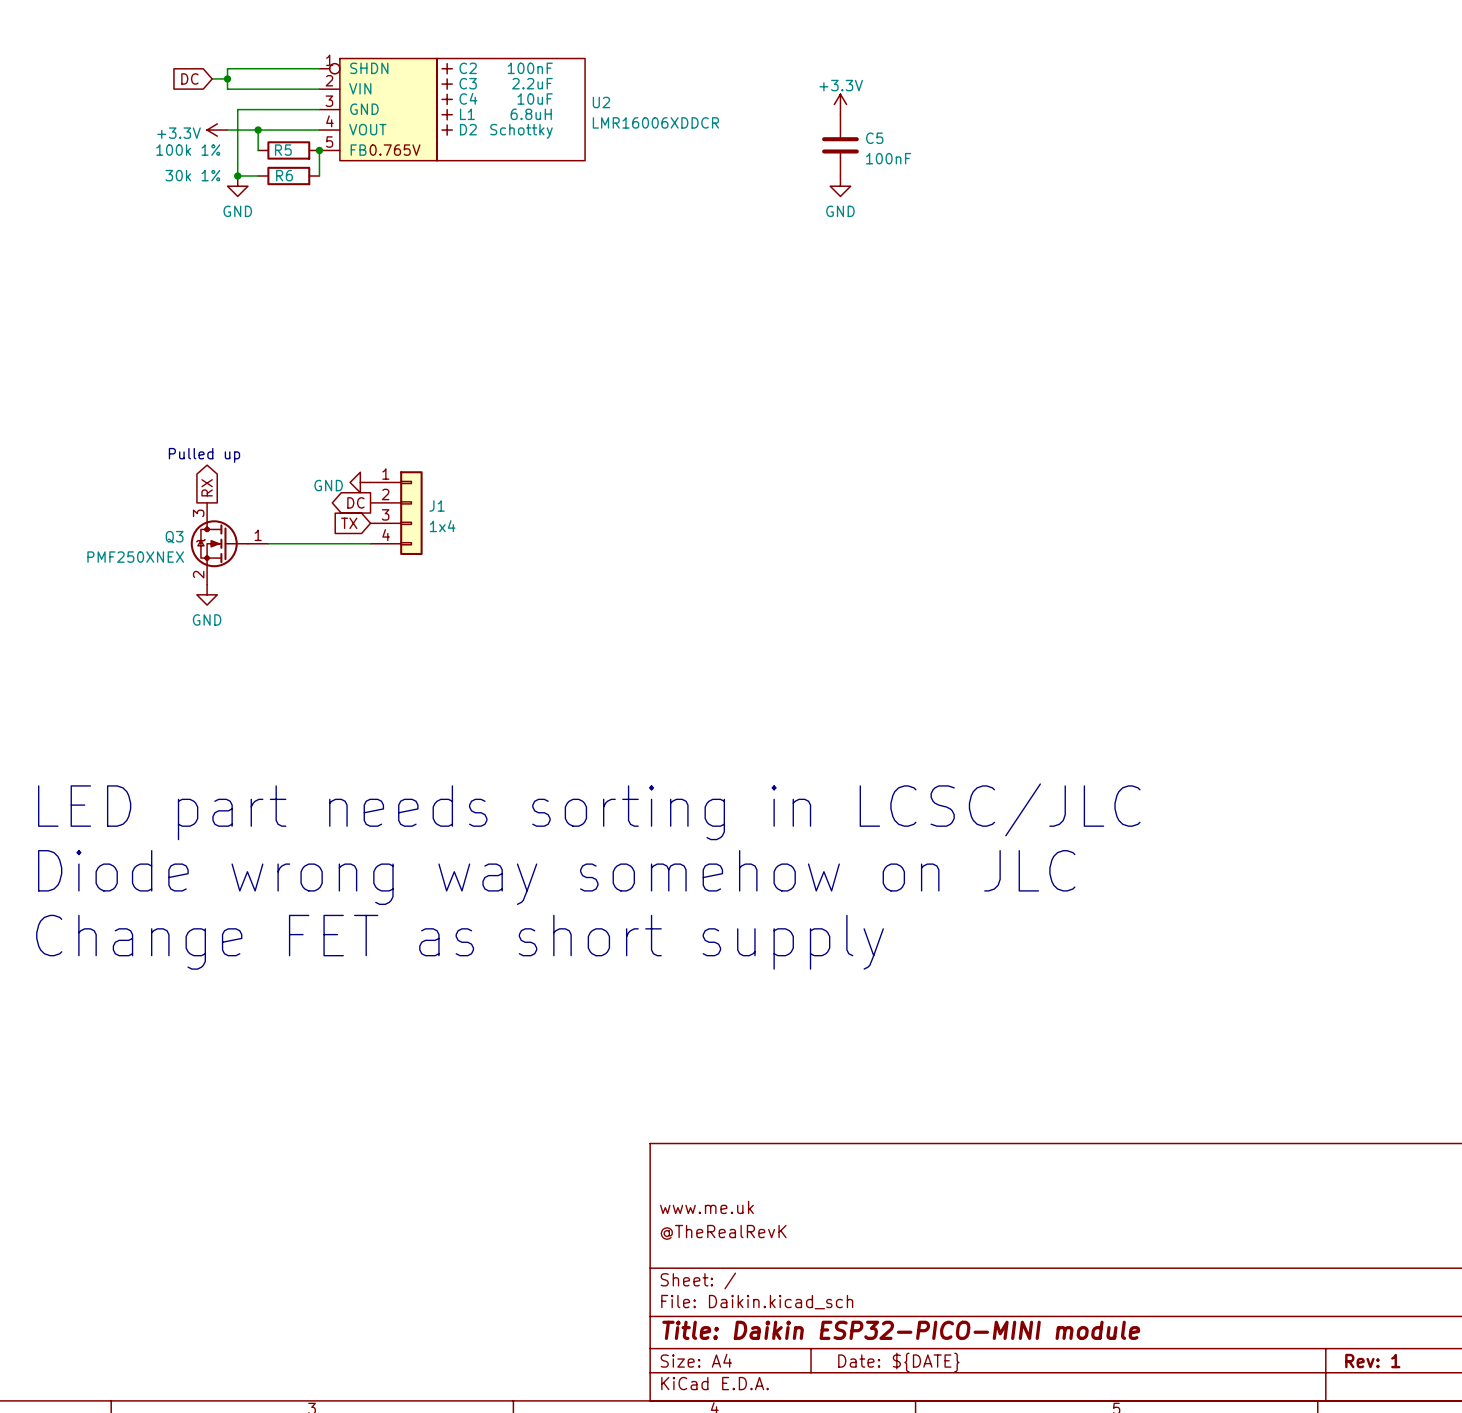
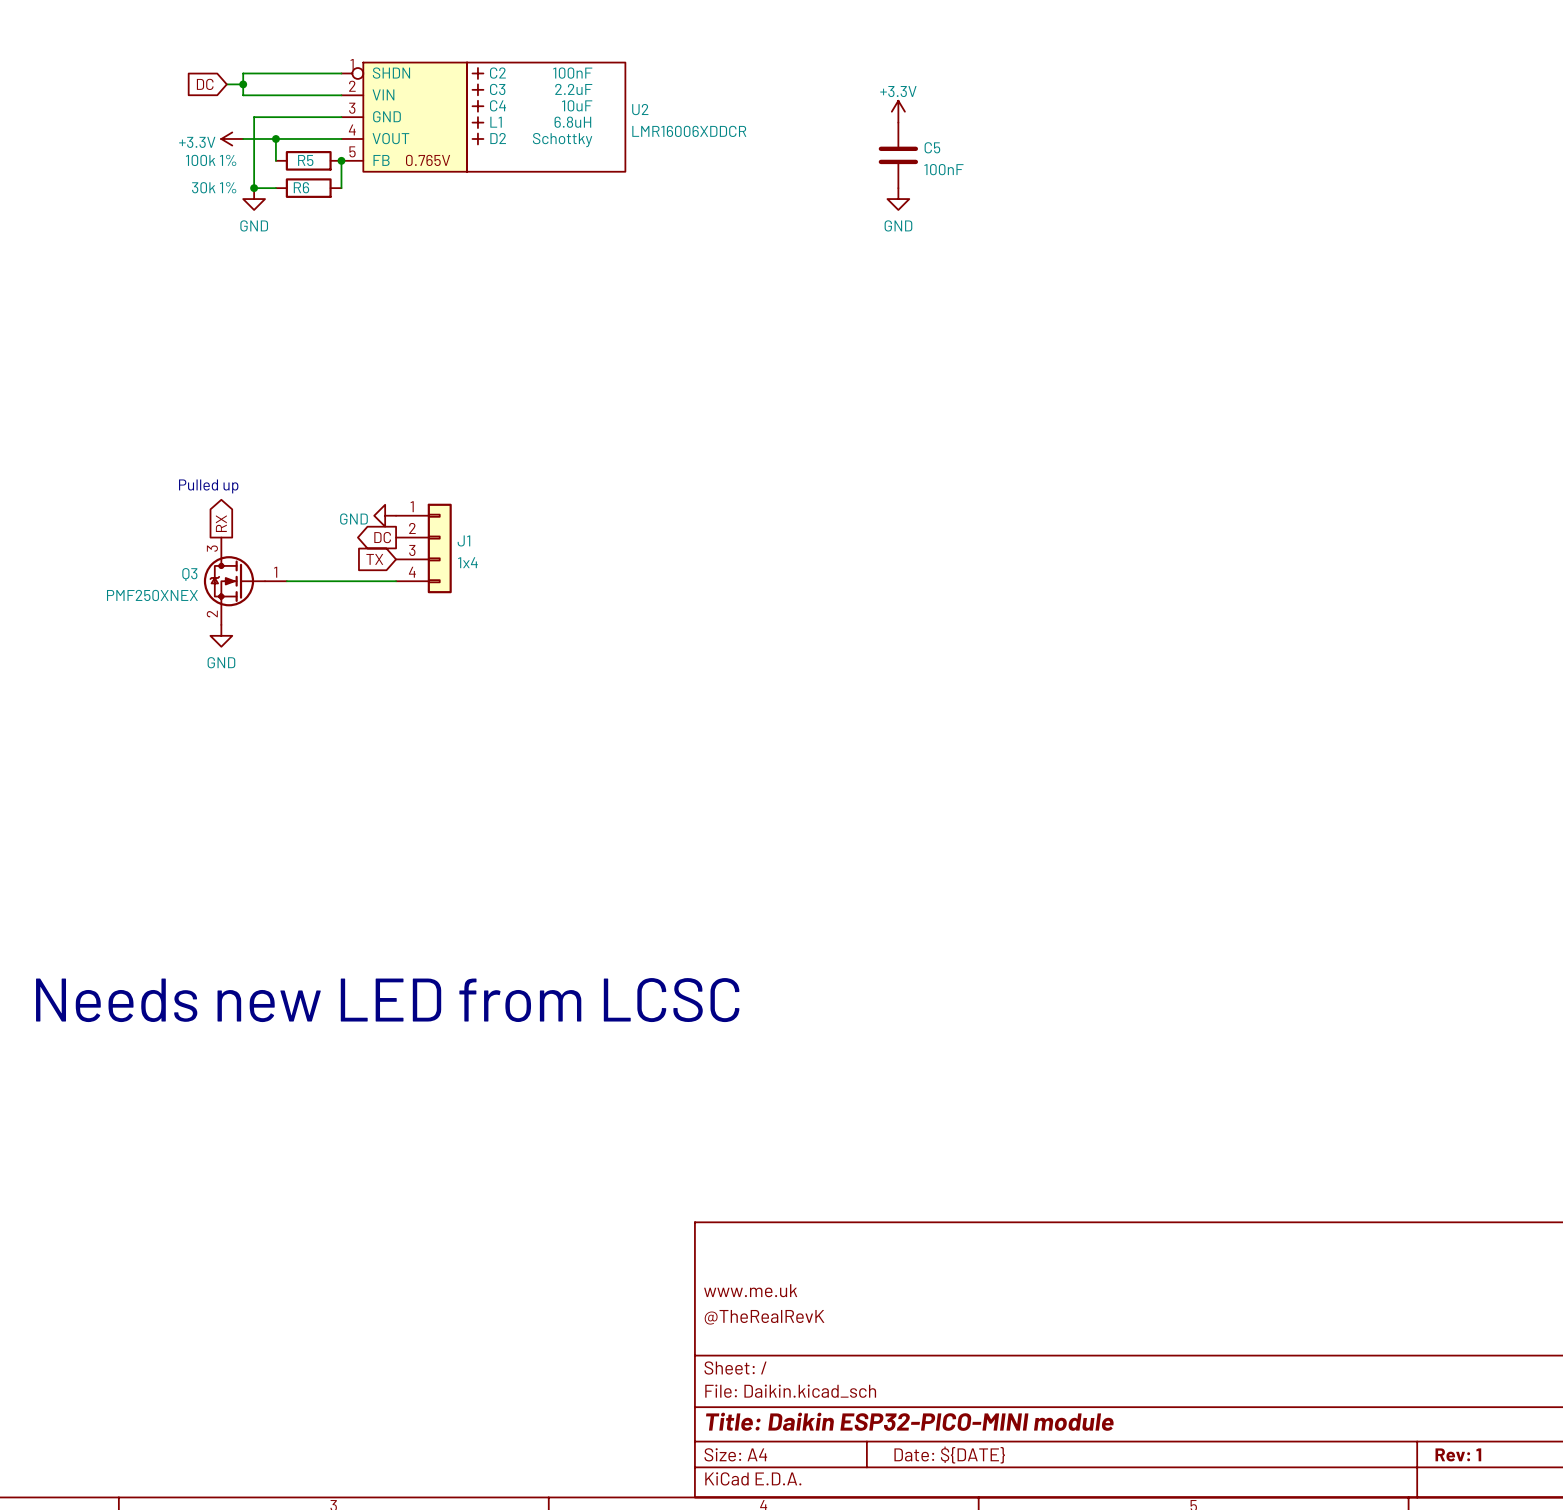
text: LED part needs sorting in LCSC/JLC (589, 811) -> none
text: Diode wrong way somehow on JLC (556, 877) -> none
text: Change FET as short supply (460, 942) -> Needs new LED from LCSC (387, 1000)

